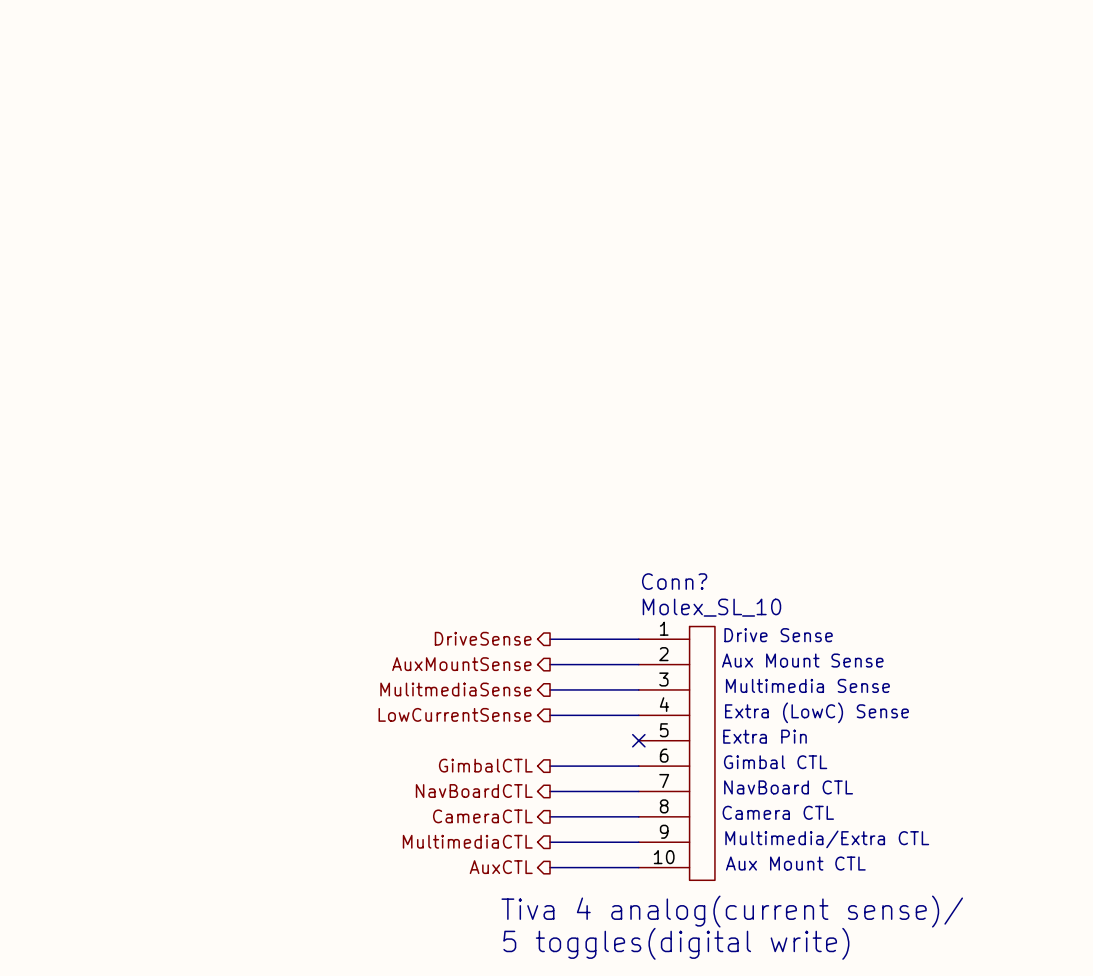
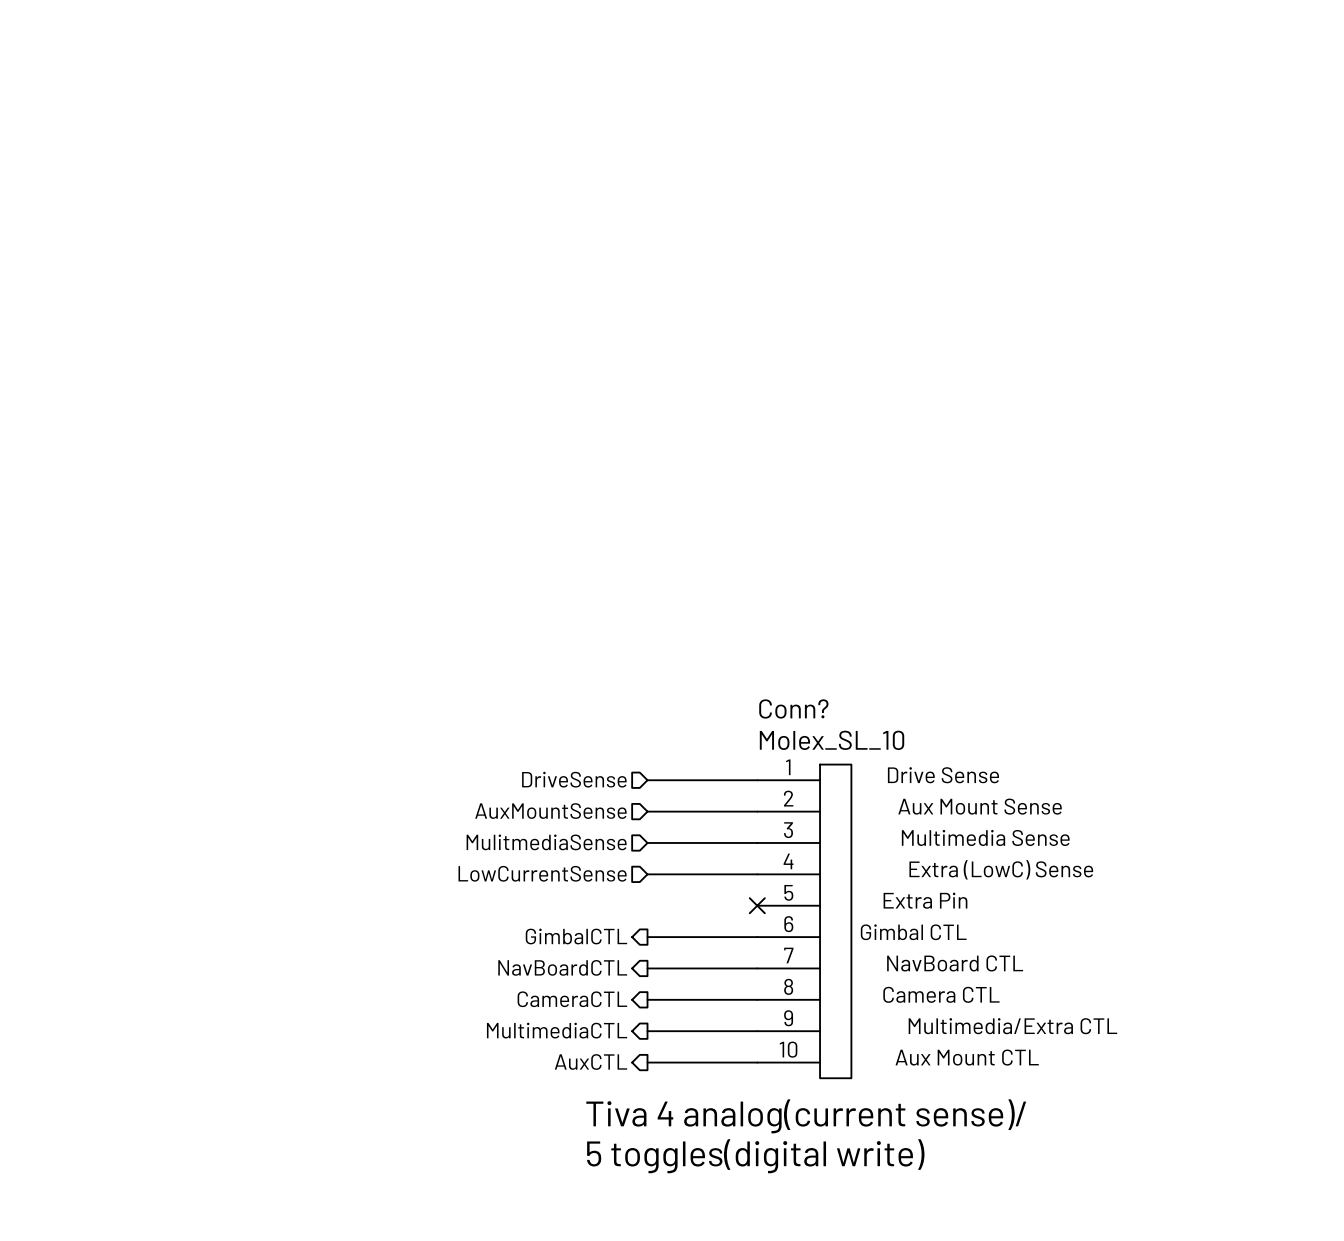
hierarchical label shape: output (483, 638) -> input (574, 779)
hierarchical label shape: output (461, 664) -> input (550, 811)
hierarchical label shape: output (455, 689) -> input (546, 842)
hierarchical label shape: output (455, 714) -> input (542, 873)

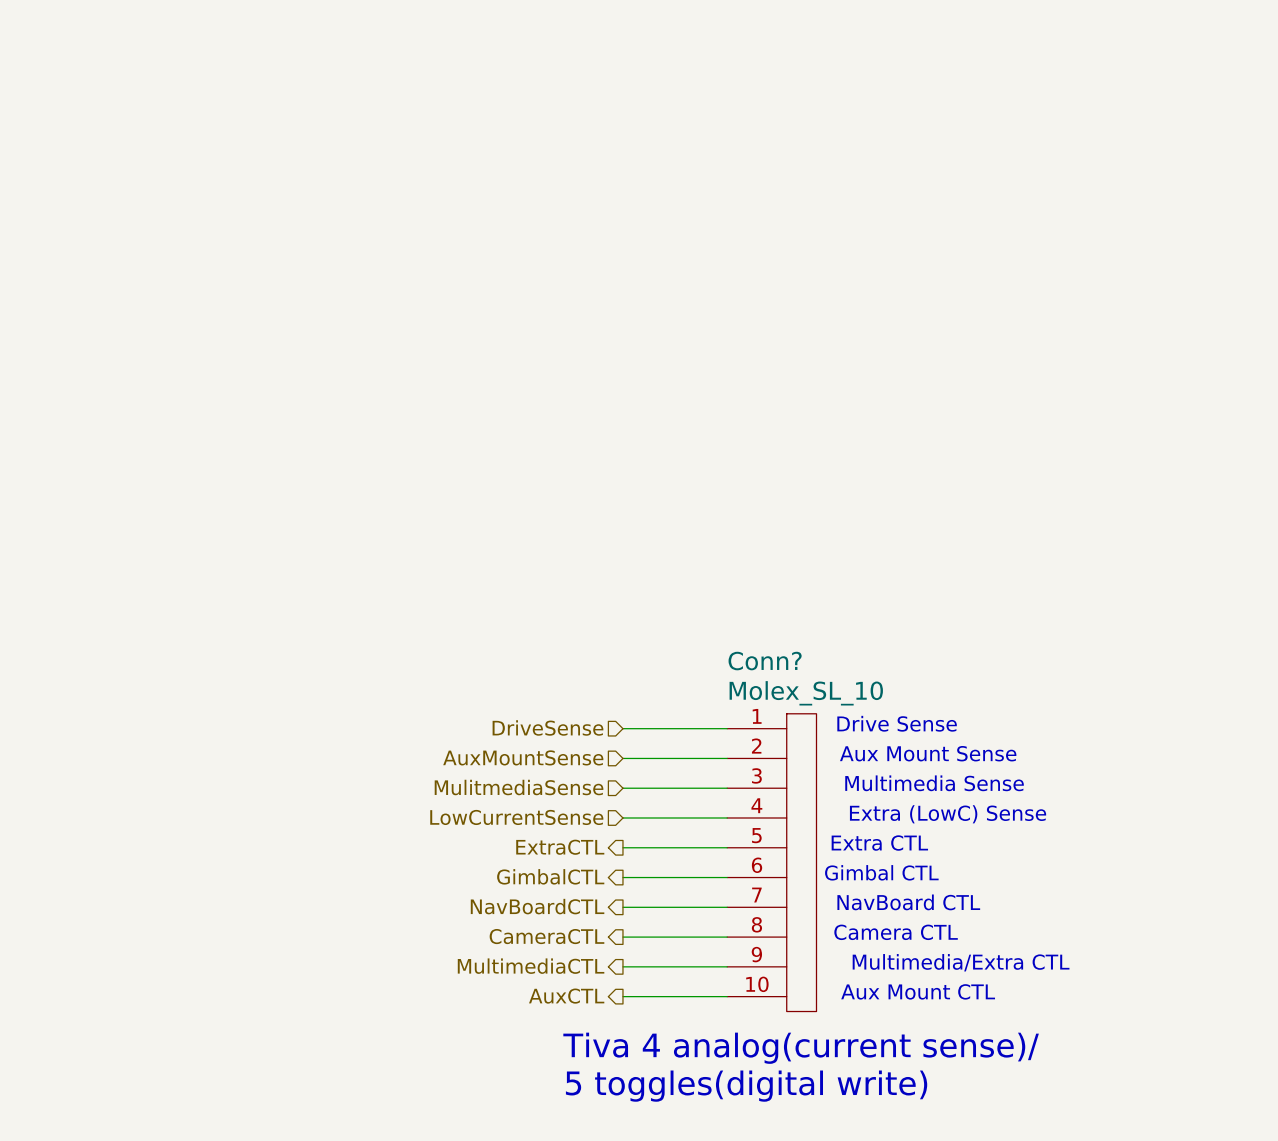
text: Extra Pin (925, 900) -> Extra CTL (879, 843)
hierarchical label: none -> ExtraCTL (560, 847)
wire: none -> (622, 847) (727, 847)
no-connect mark: (757, 905) -> none

